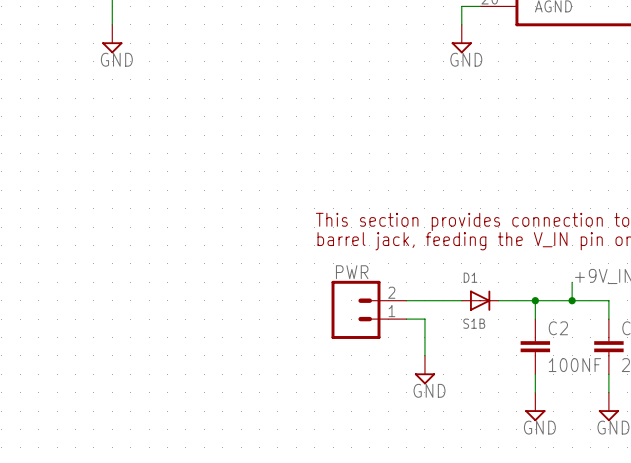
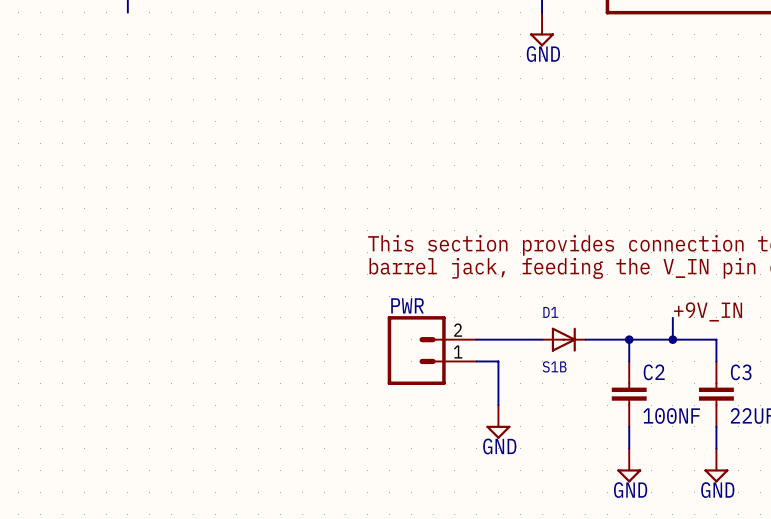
power symbol: GND (112, 39) -> none

